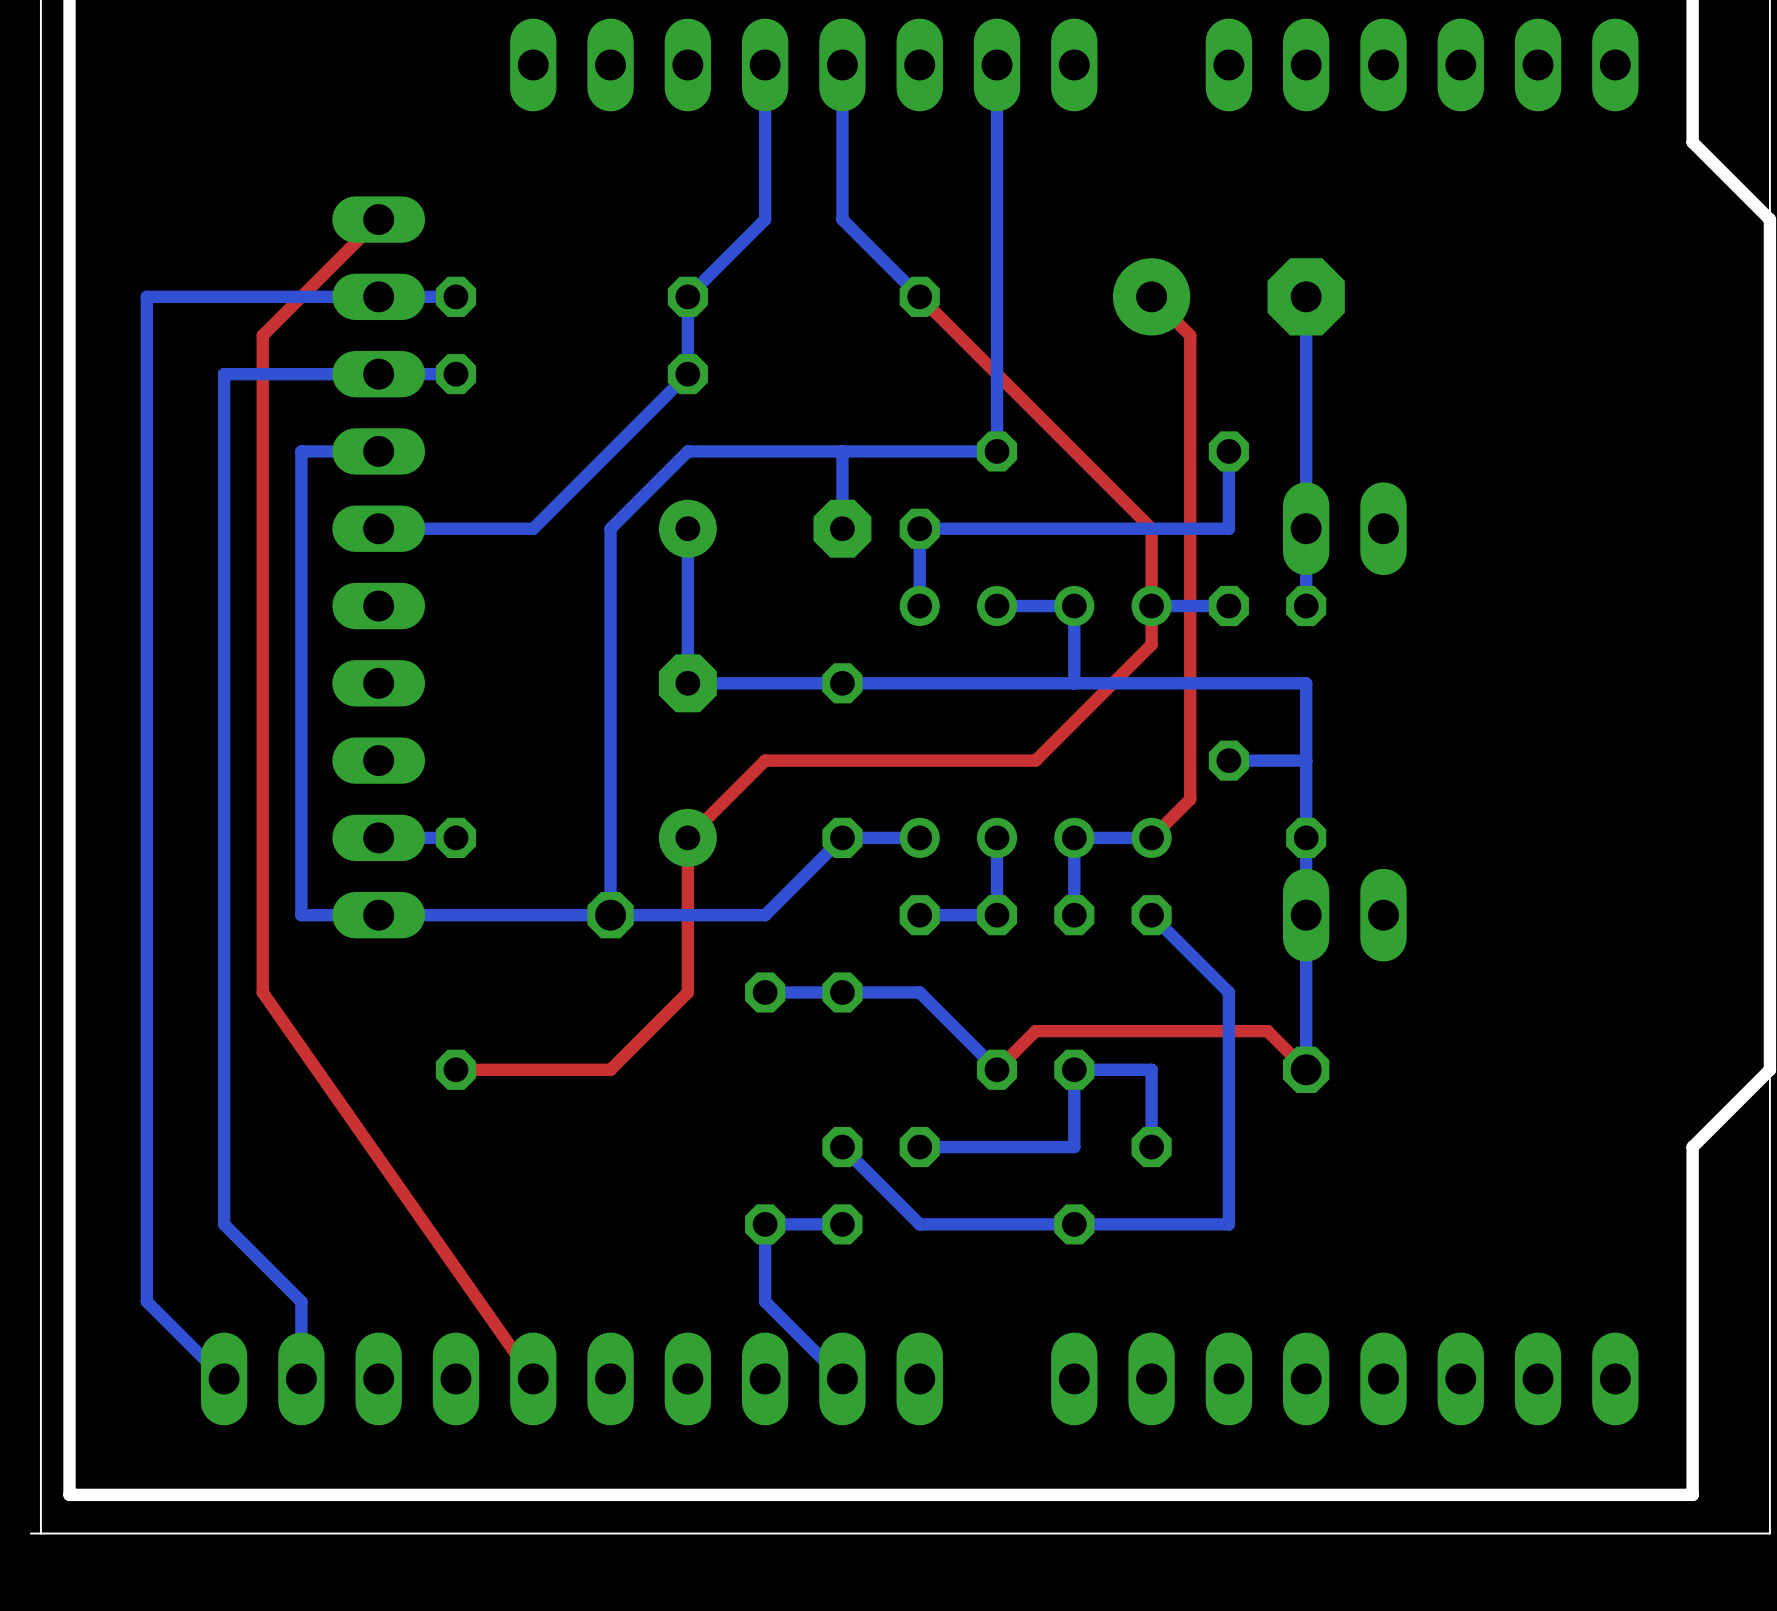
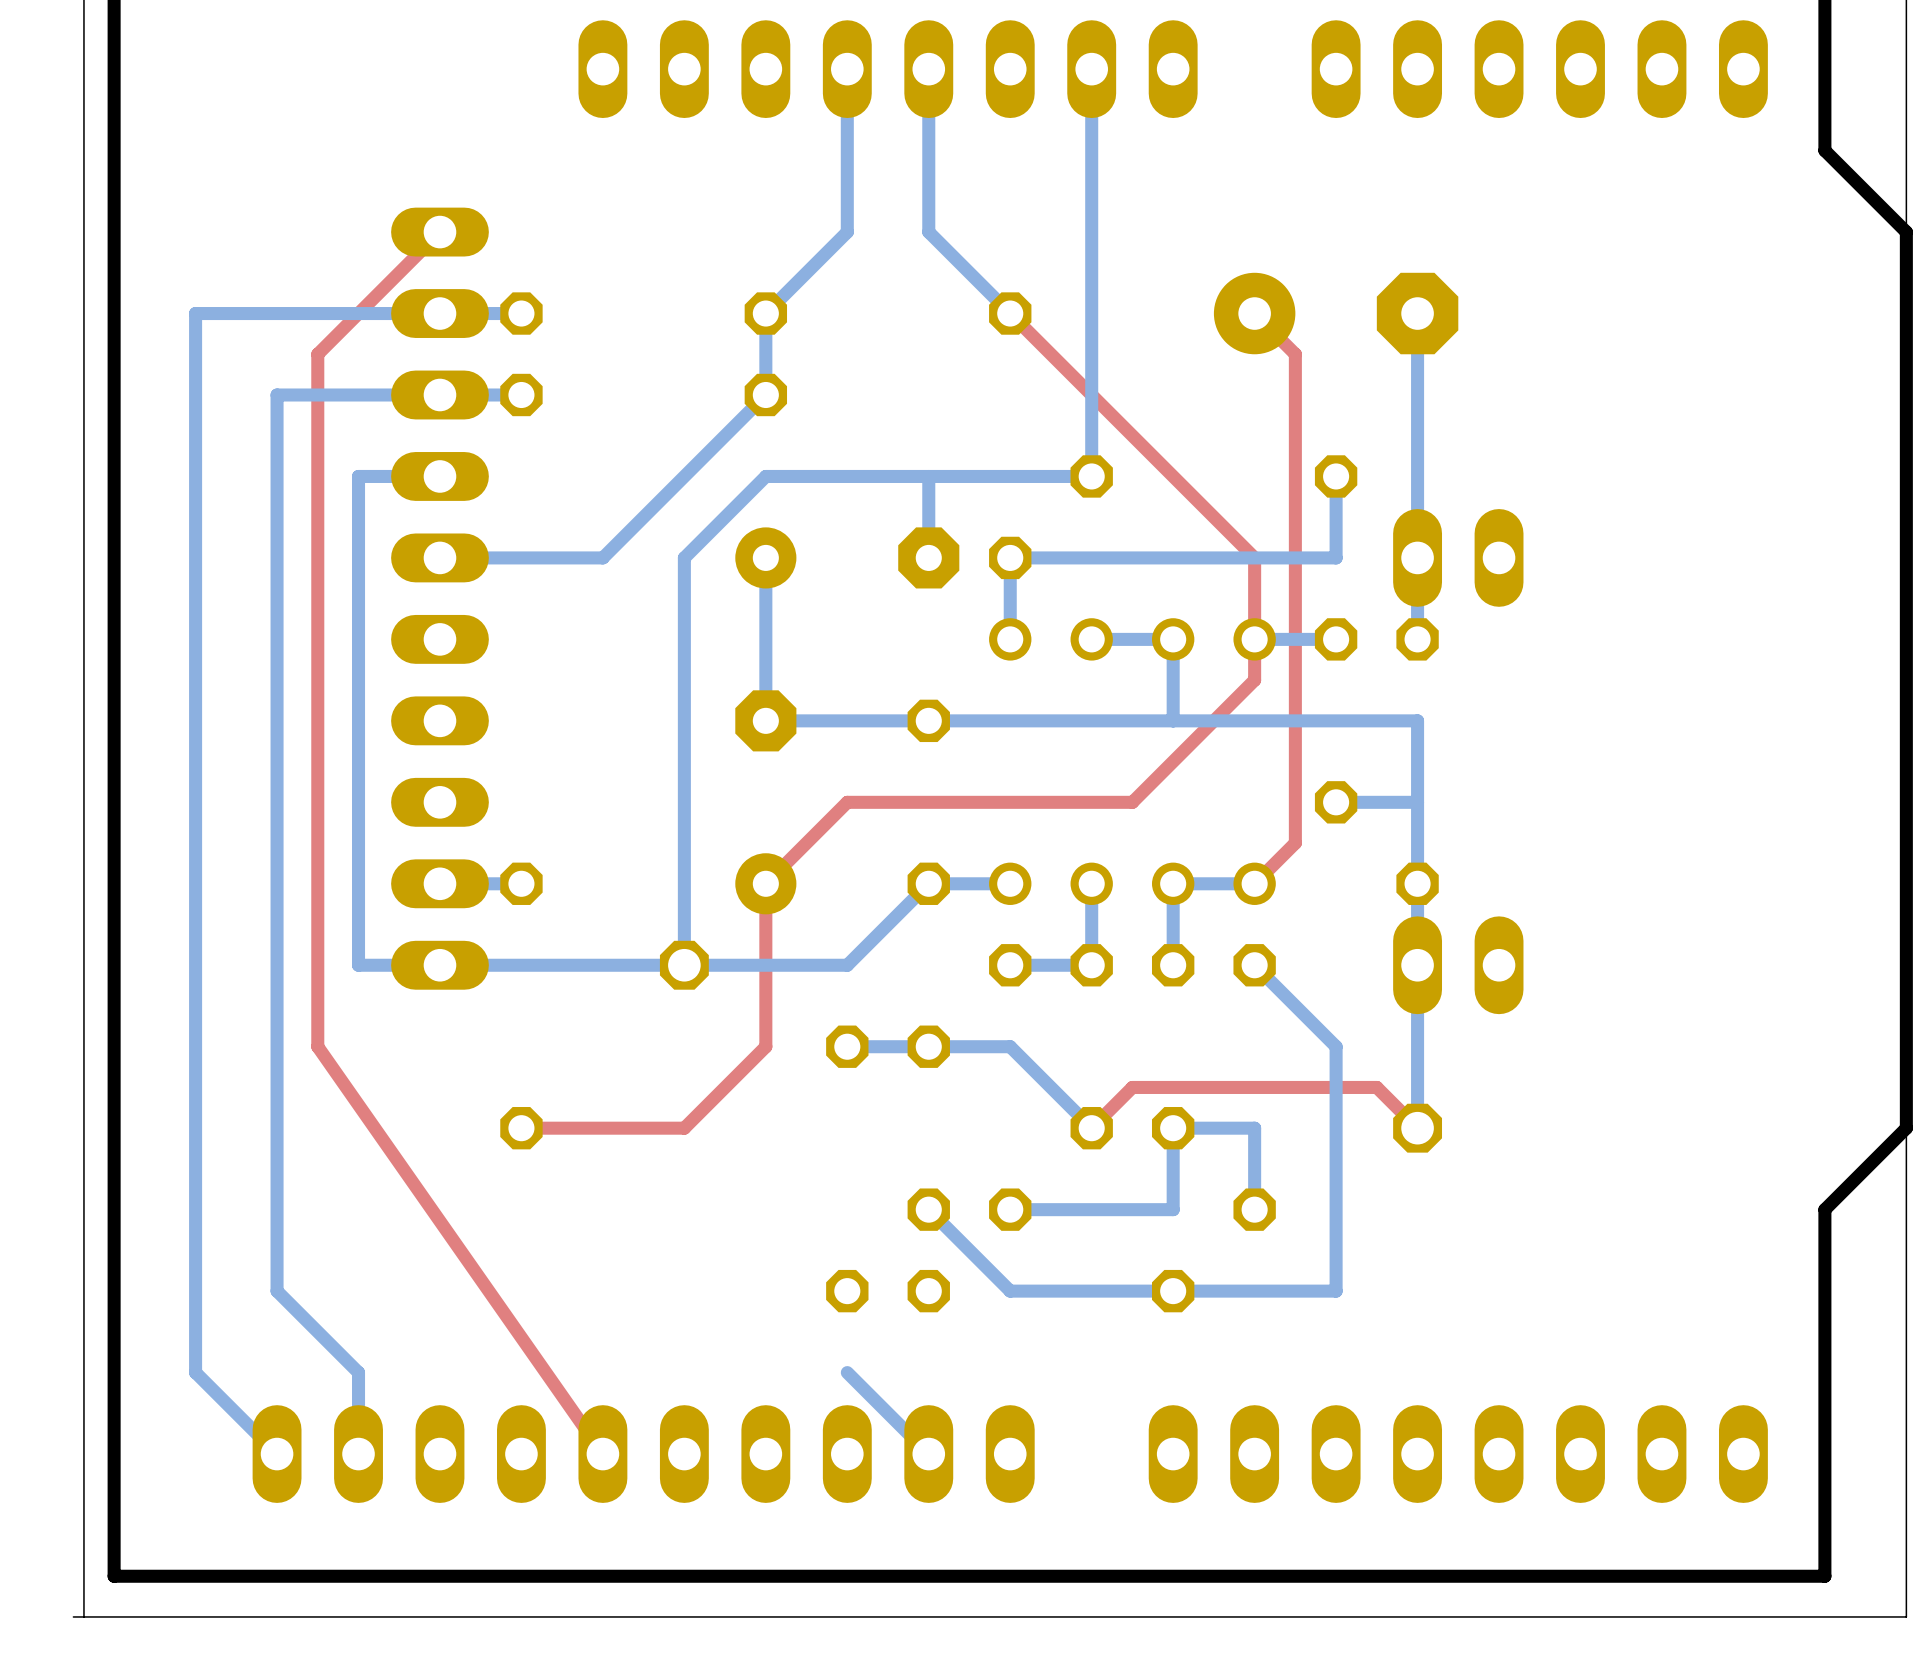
bottom track: (842, 1224) (765, 1224) (765, 1301) -> none

